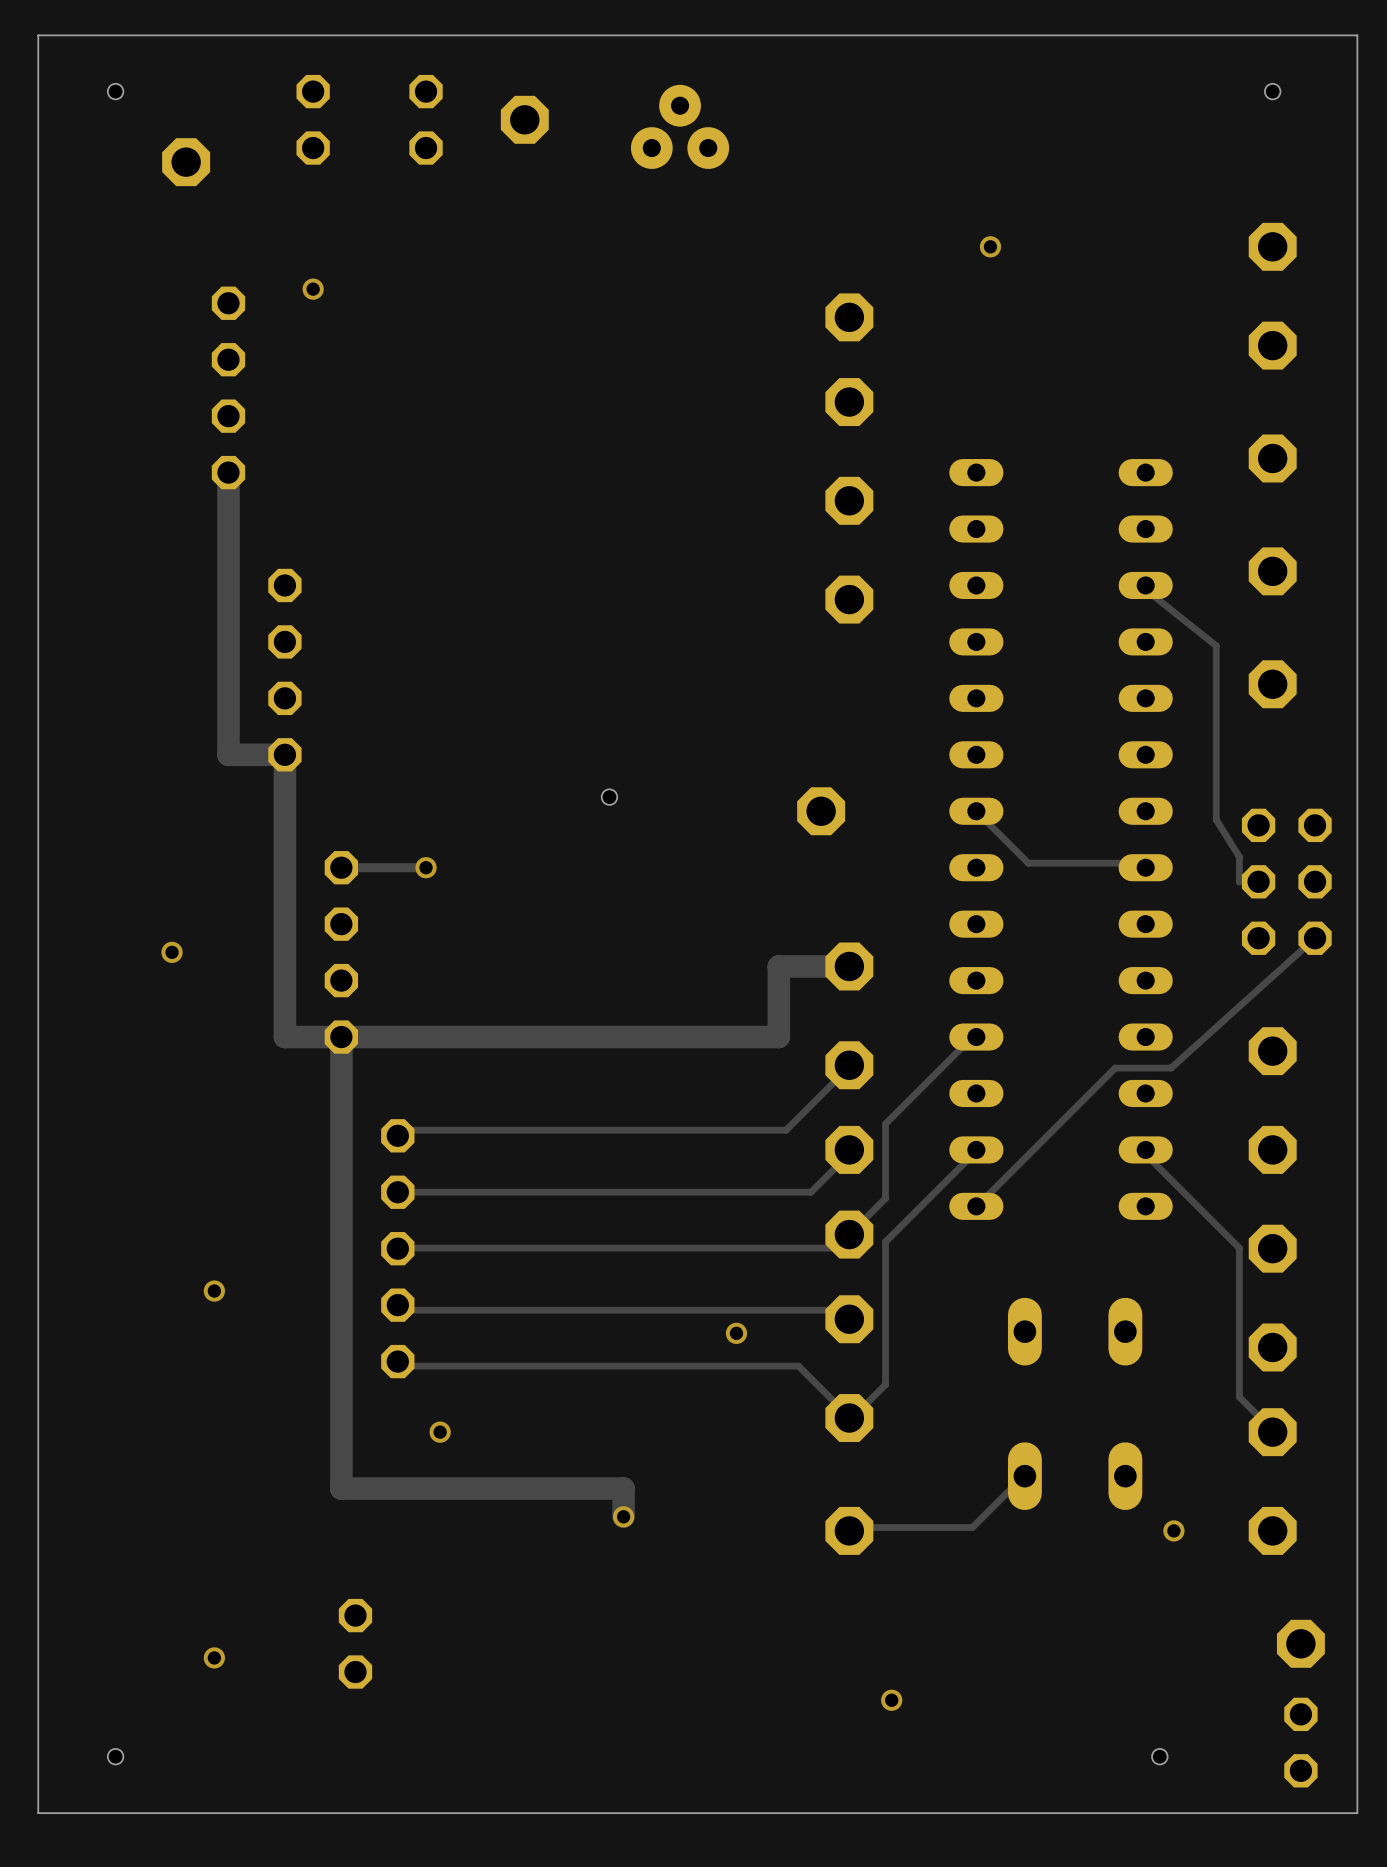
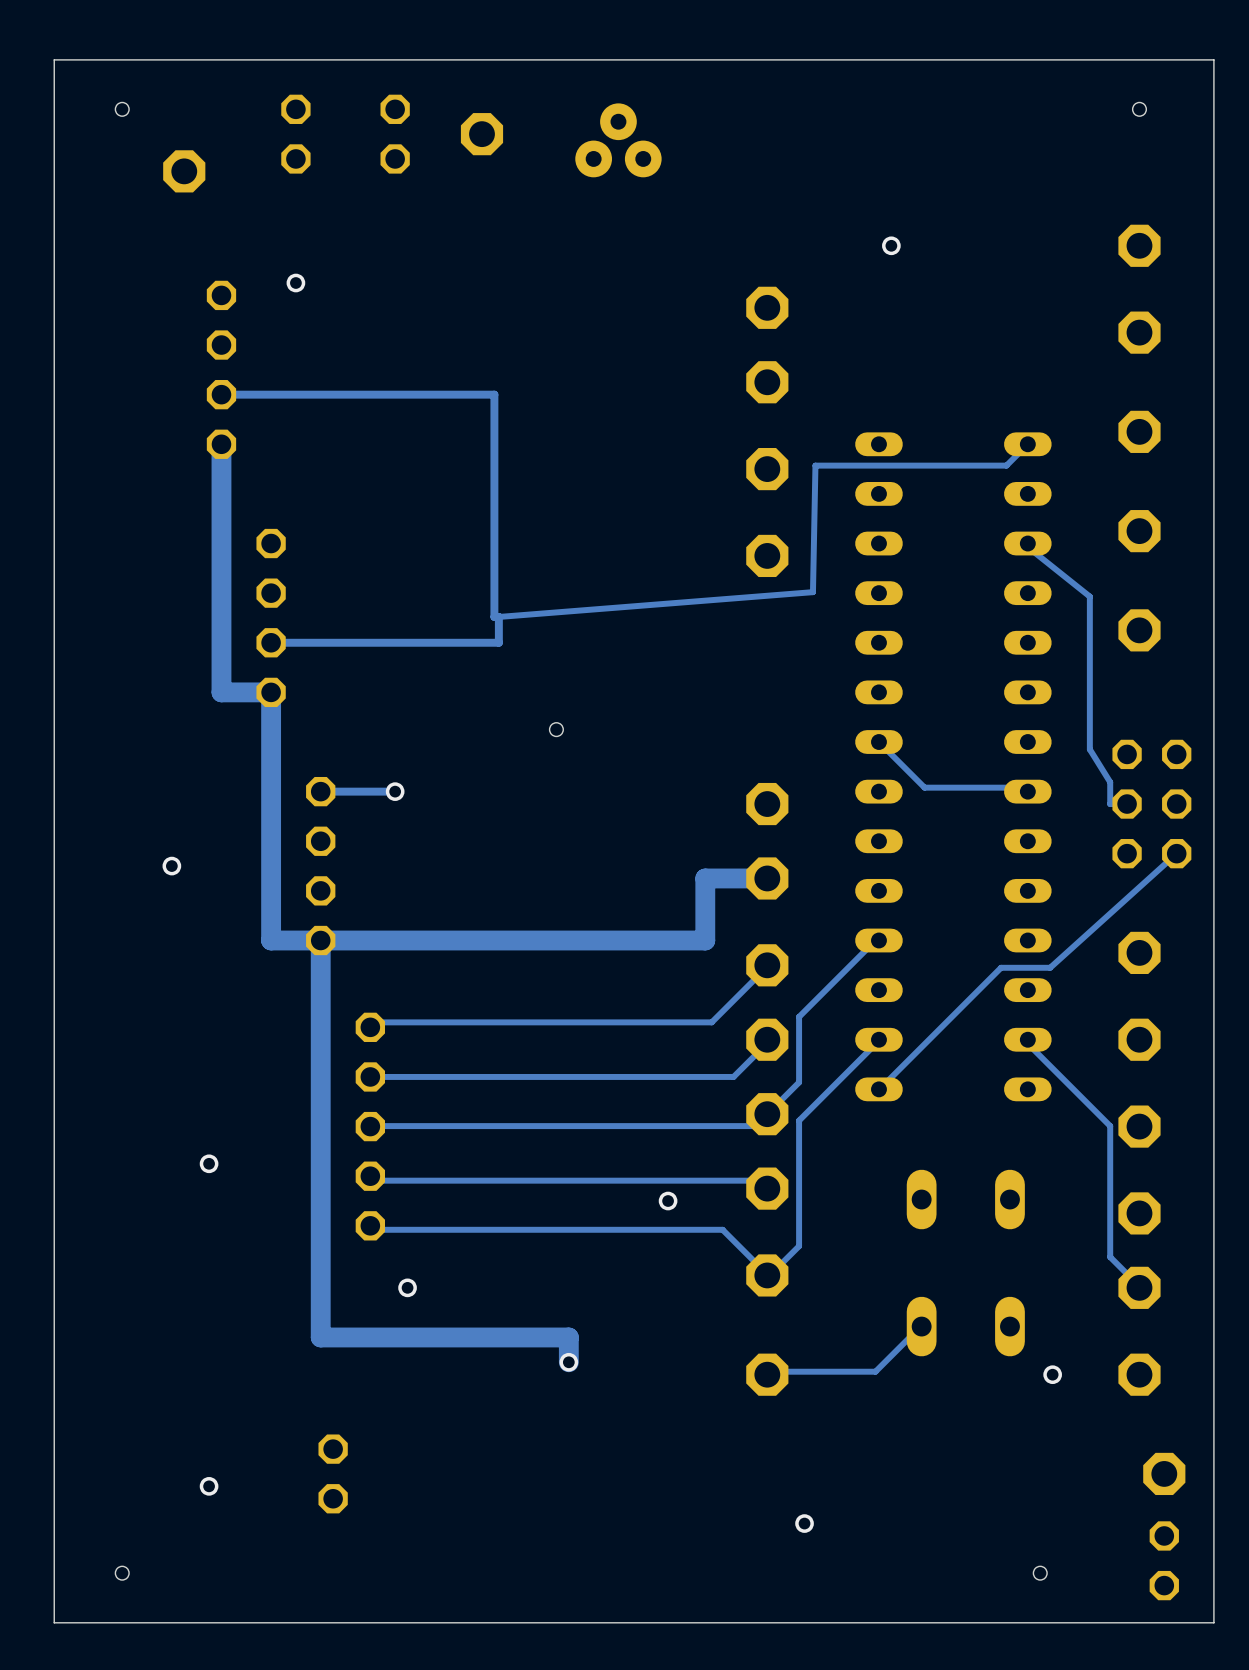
track: none -> (221, 394) (494, 394) (494, 616) (498, 616)
track: none -> (1027, 444) (1006, 465) (815, 465) (812, 592) (498, 616)
track: none -> (498, 616) (498, 642) (271, 642)
part position: (821, 811) -> (767, 804)

